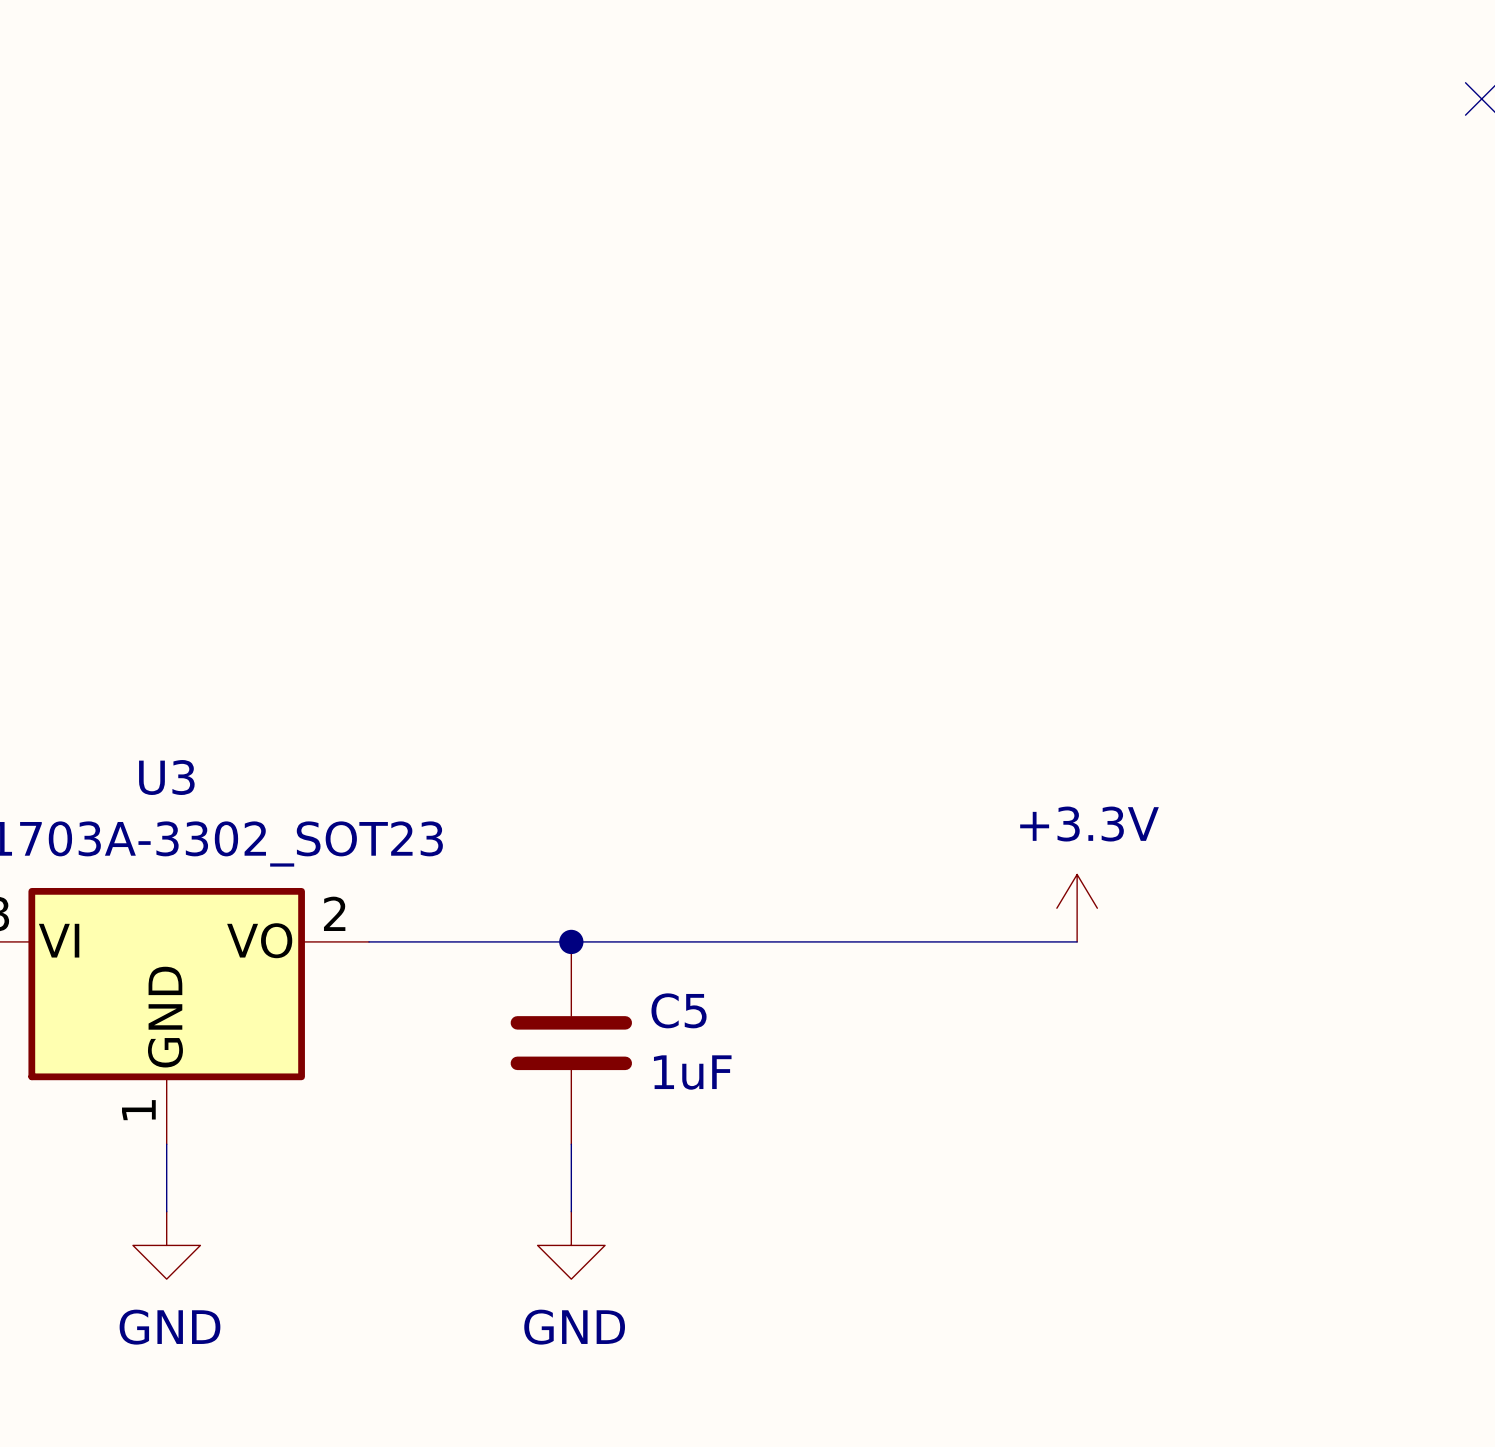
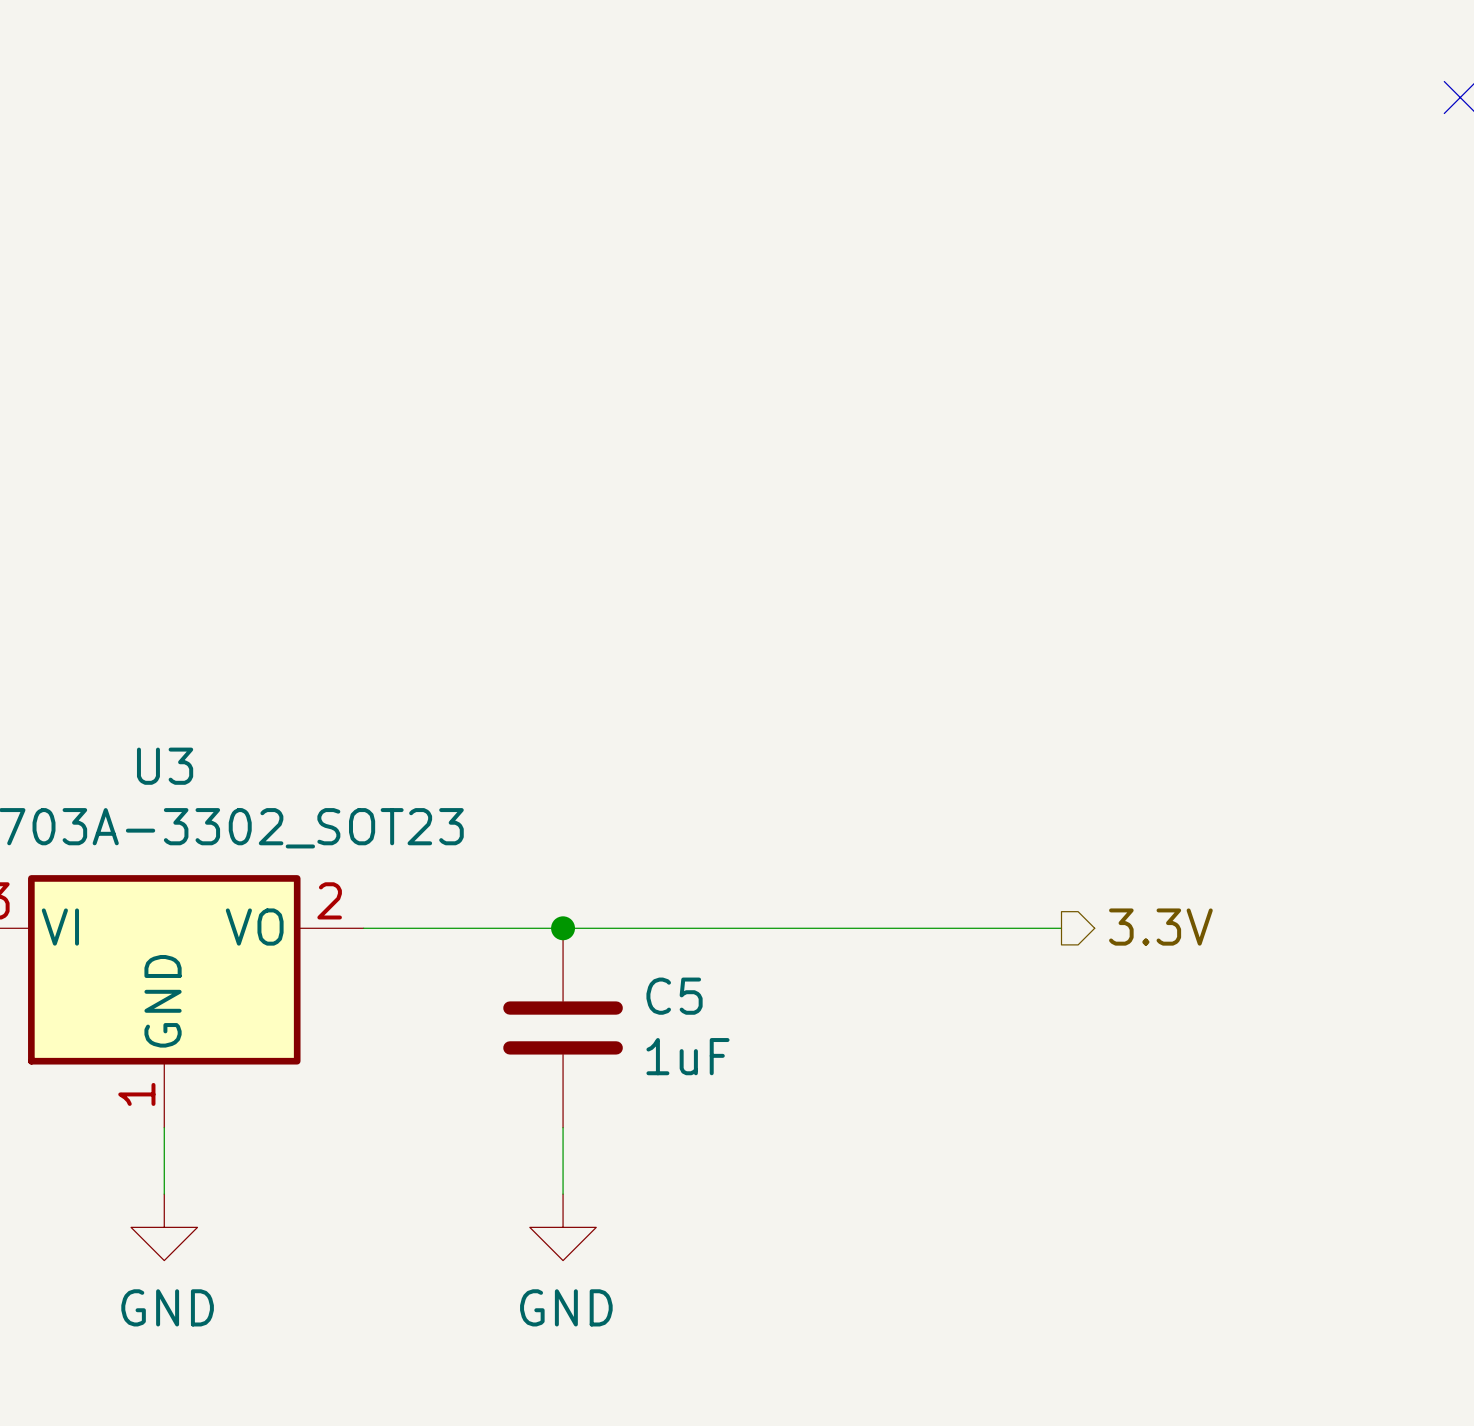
power symbol: +3.3V (1077, 908) -> none
hierarchical label: none -> 3.3V (1160, 927)

